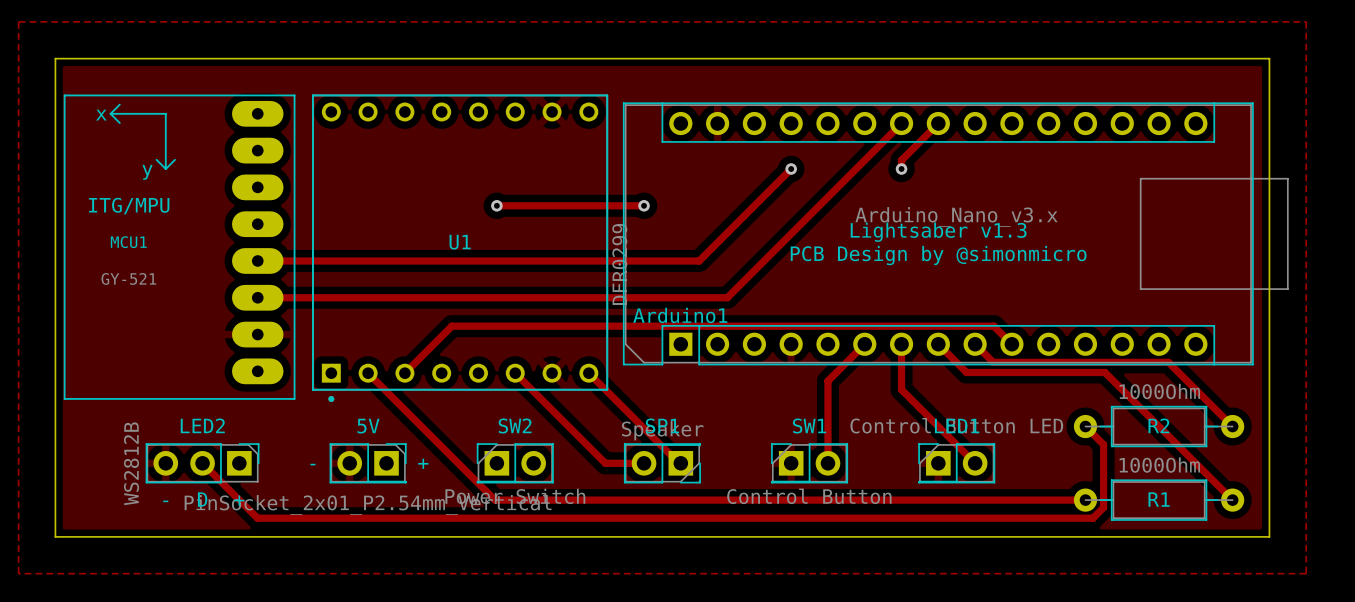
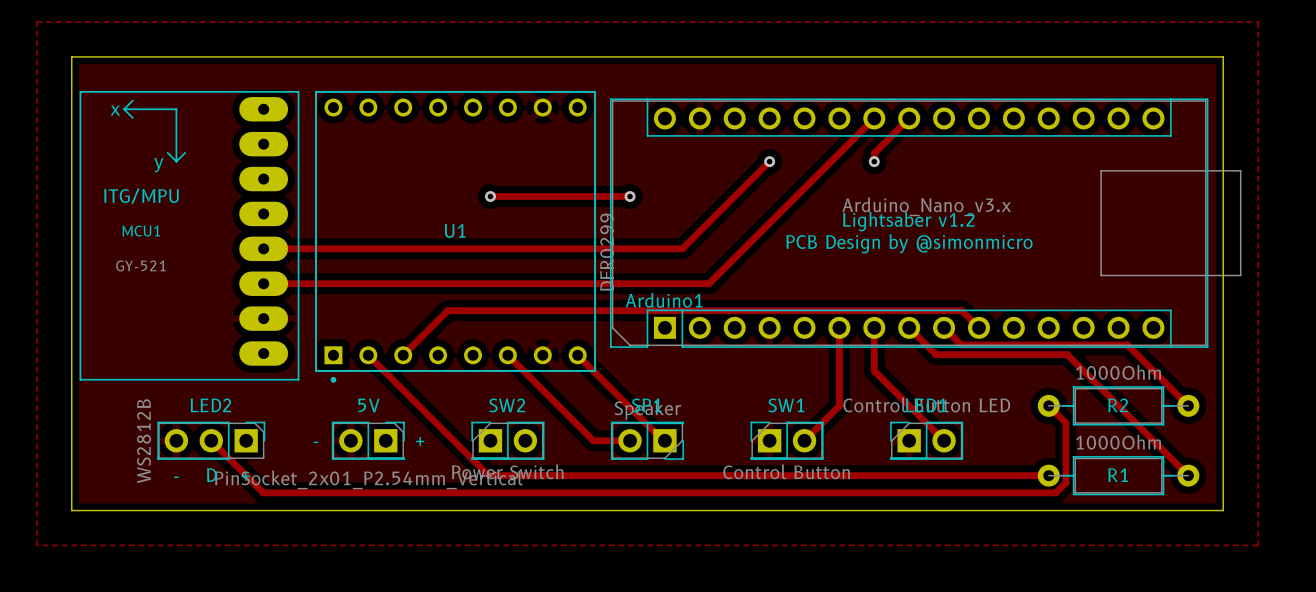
text: Lightsaber v1.3 (938, 232) -> Lightsaber v1.2 (908, 221)
track: (864, 344) (827, 381) (827, 463) -> (839, 327) (839, 405) (804, 440)

